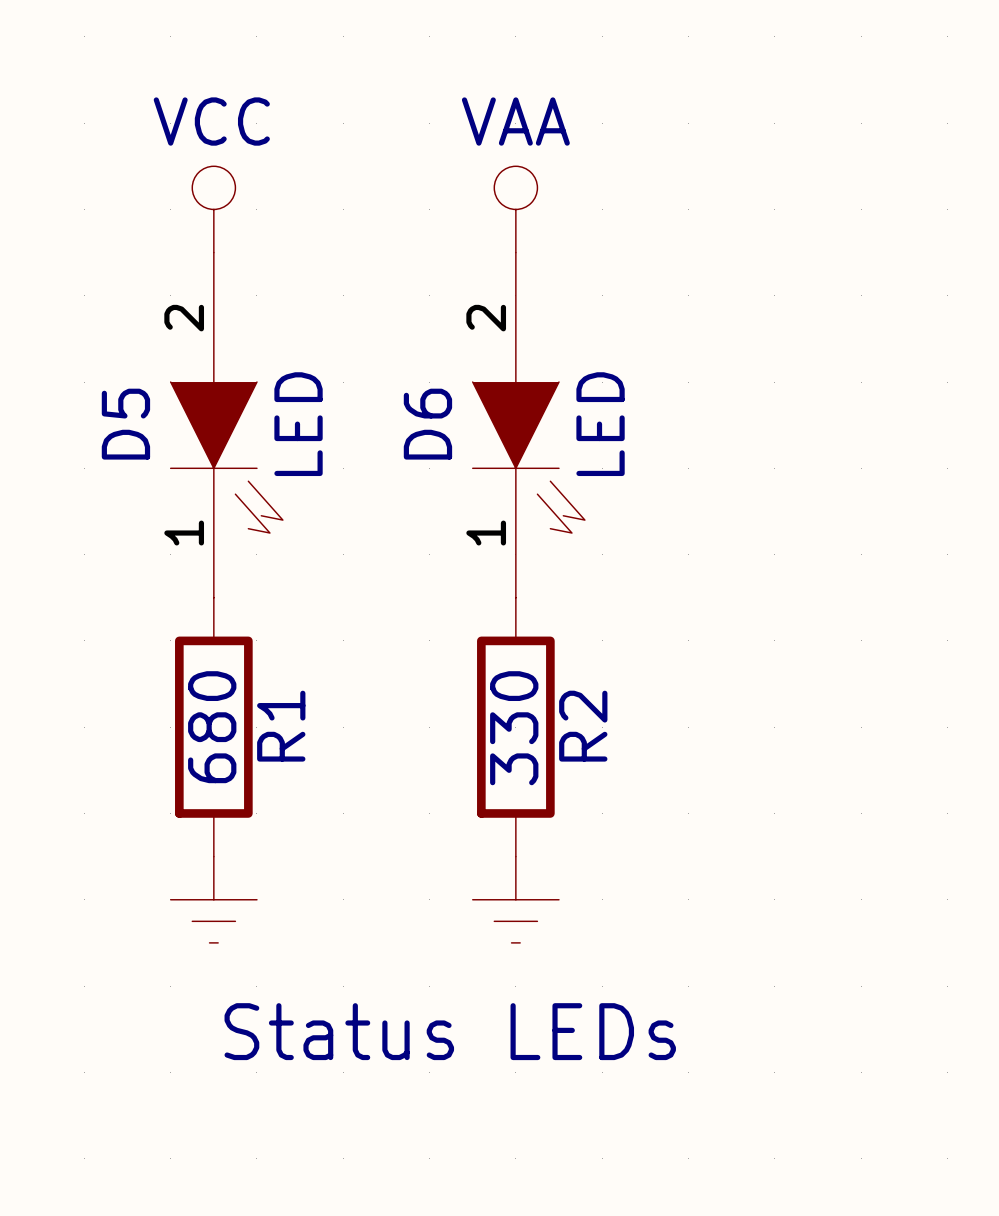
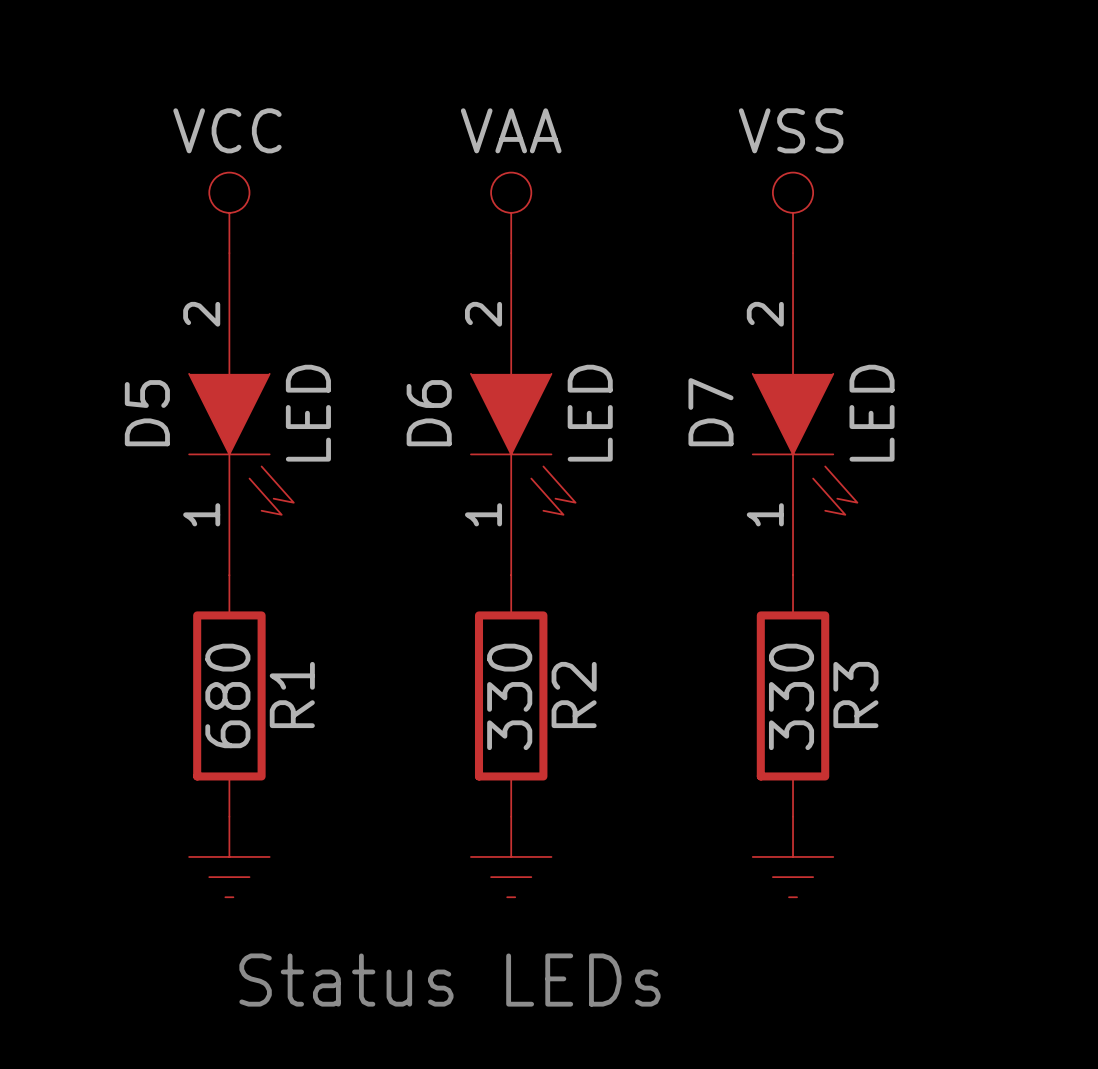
power symbol: none -> VSS (793, 212)
D7: none -> LED (805, 414)
R3: none -> 330 (793, 695)
power symbol: none -> (793, 856)

